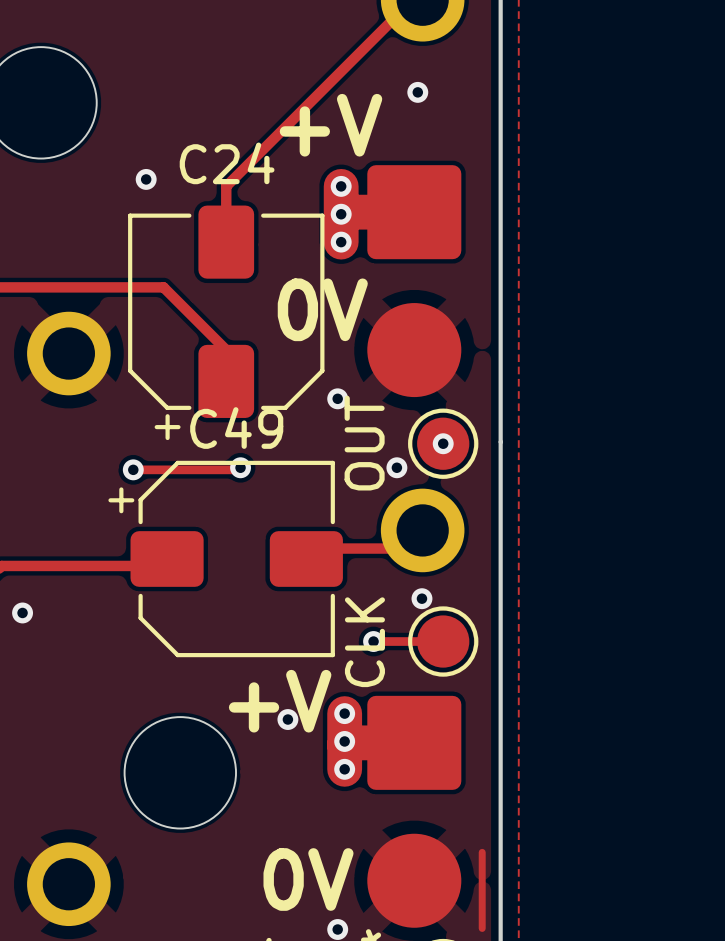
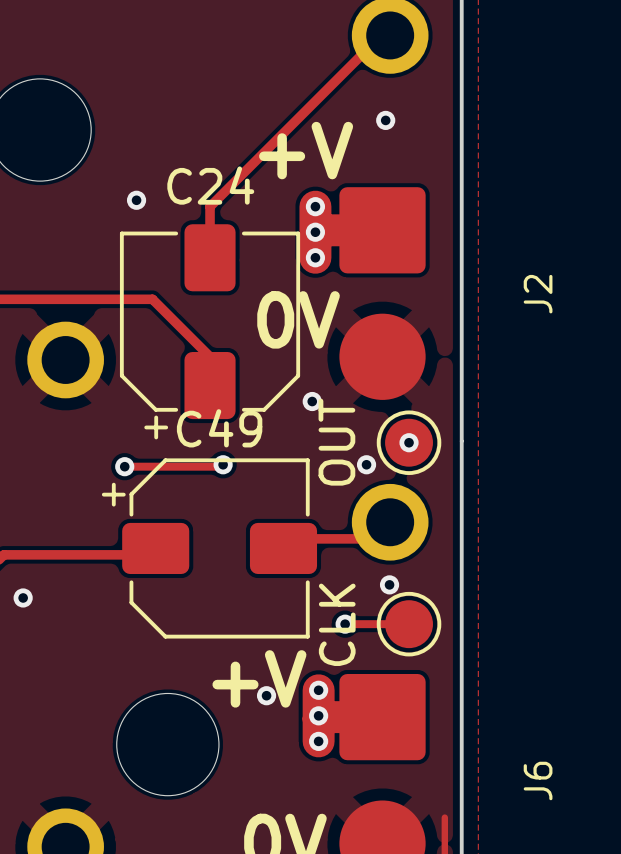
J2 name: none -> J2 (538, 294)
J6 name: none -> J6 (538, 780)

